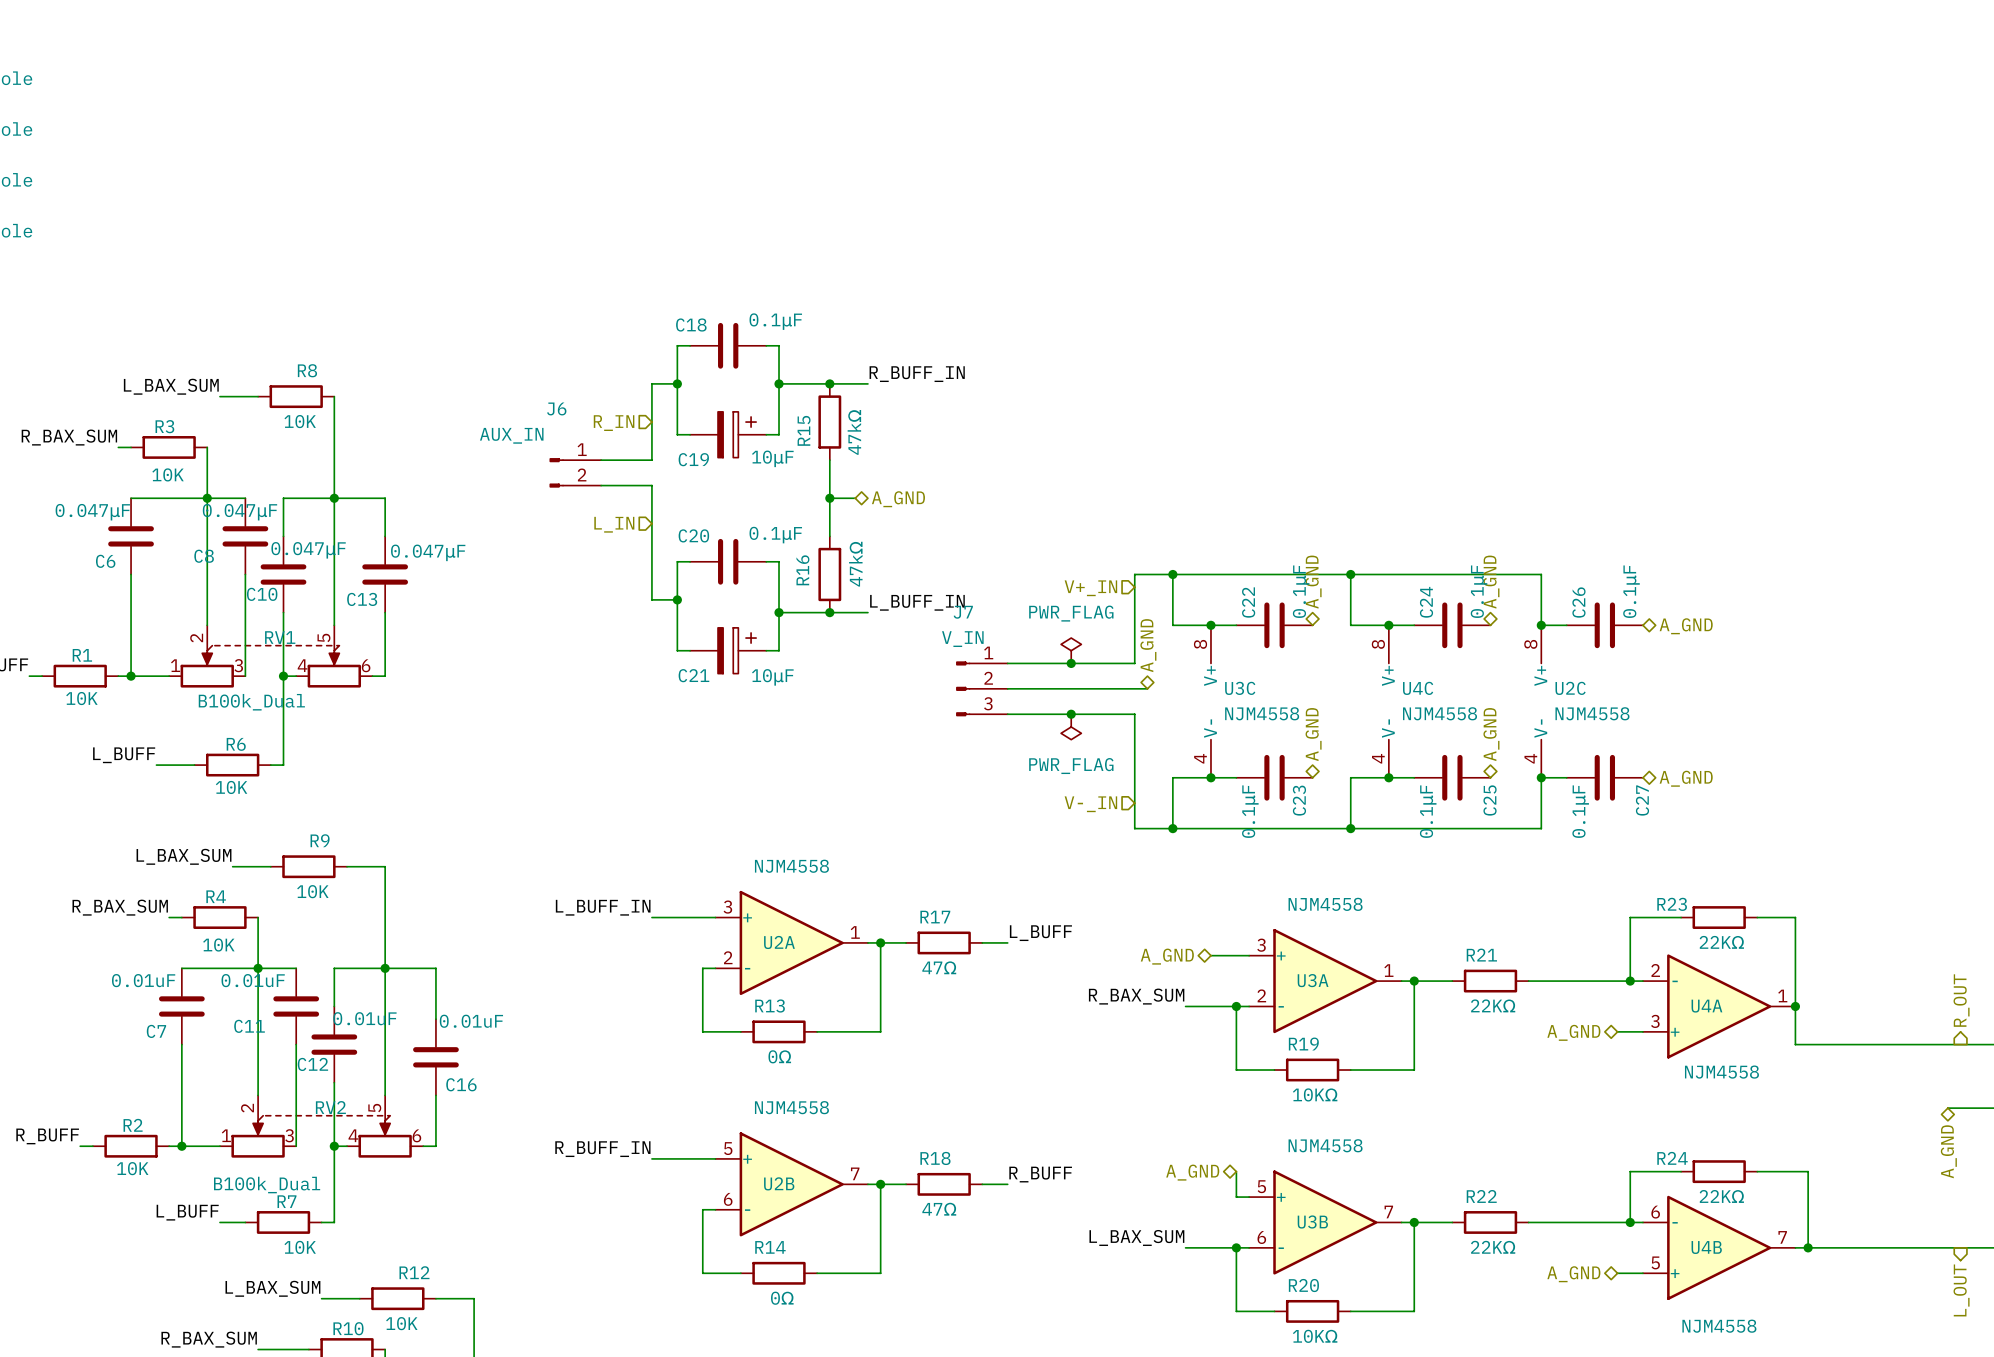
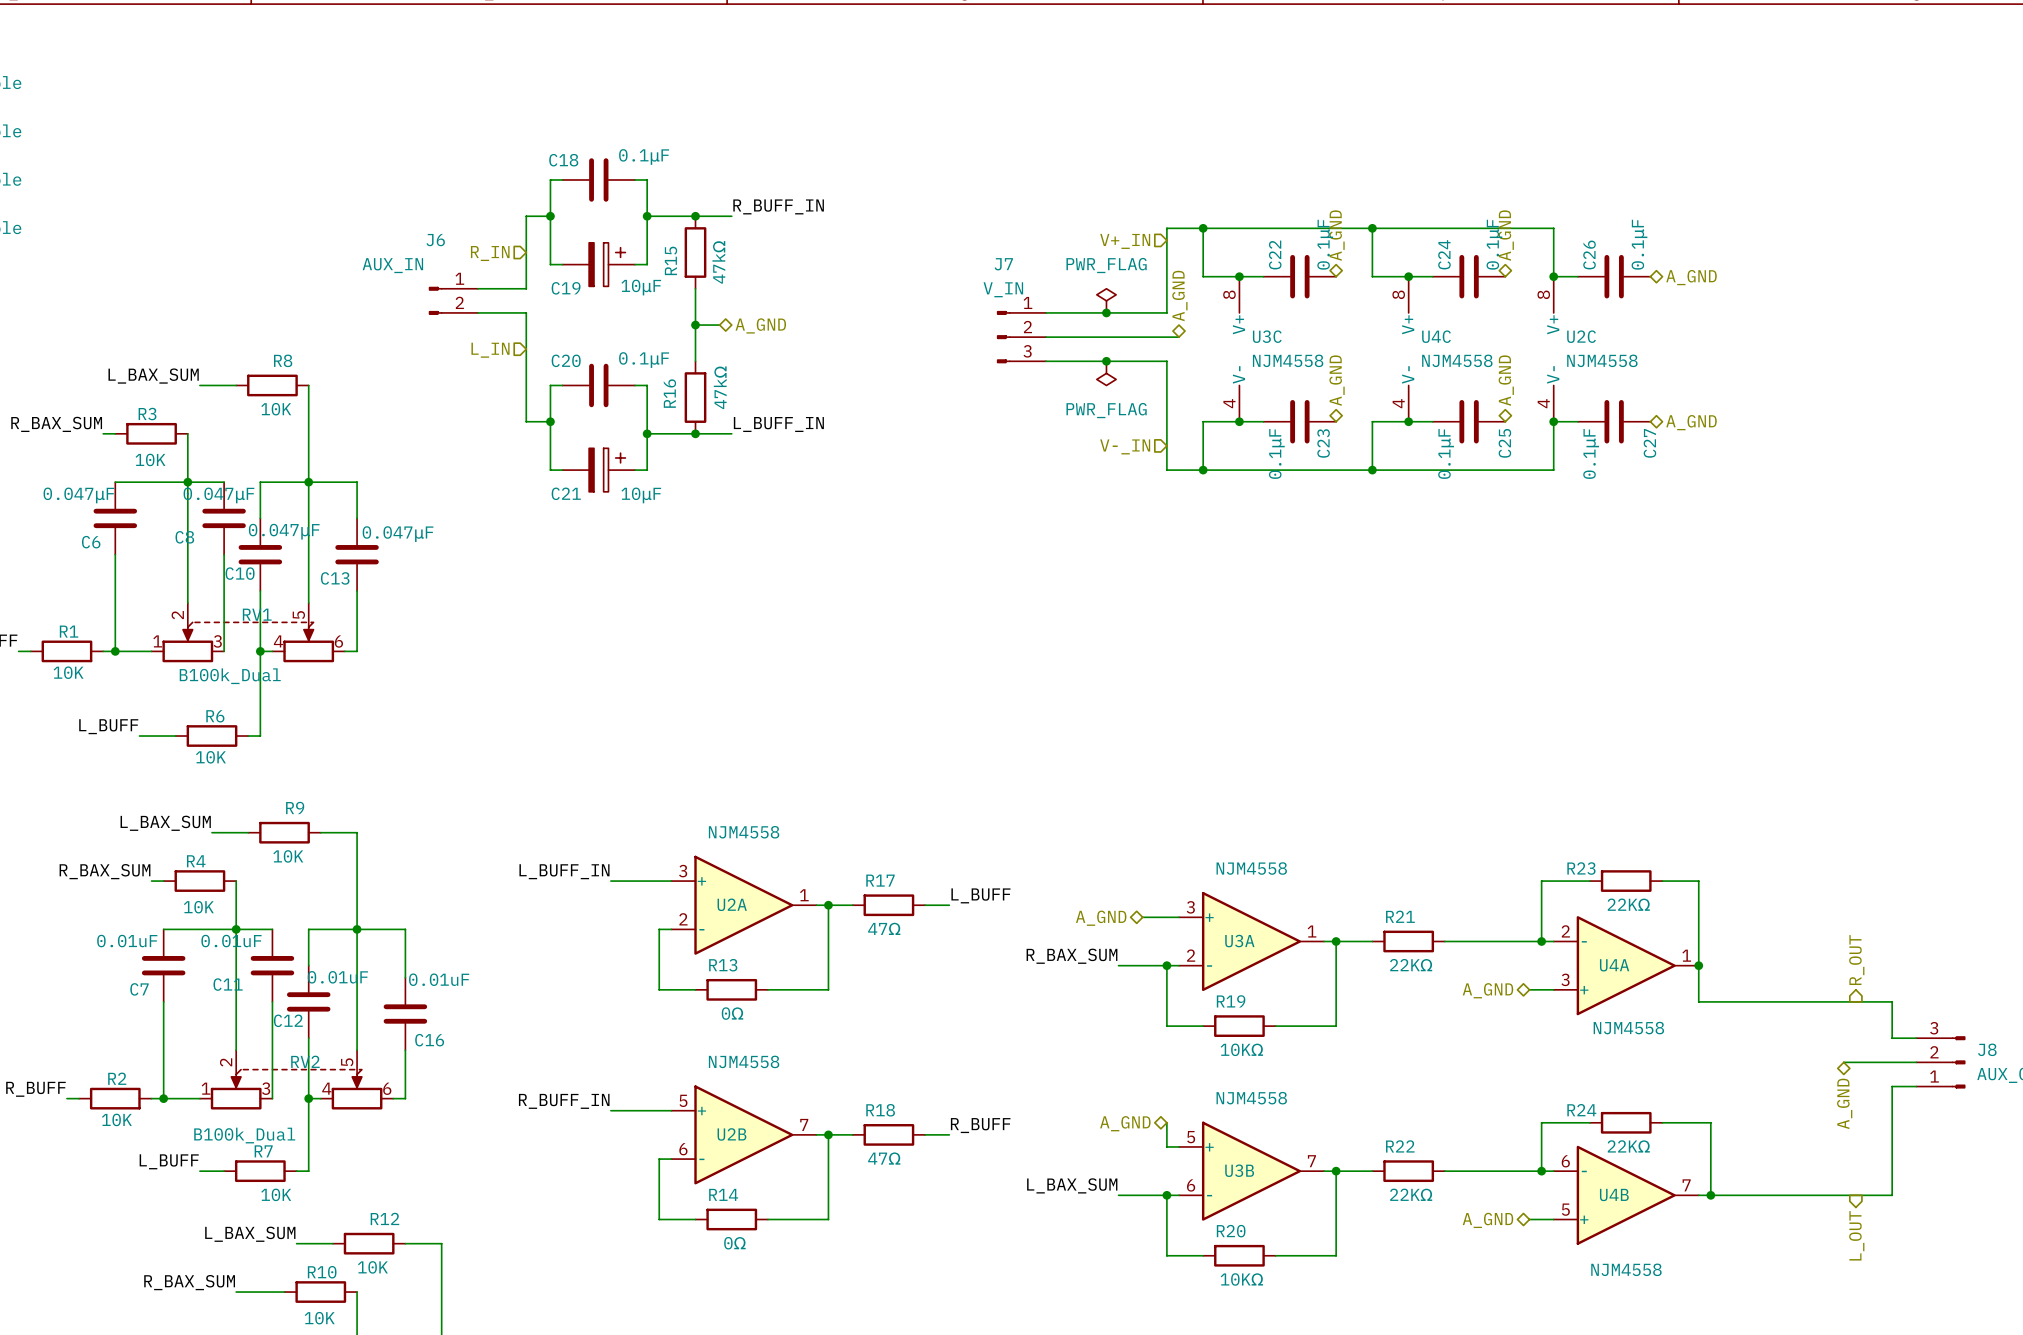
junction: none -> (550, 216)
junction: none -> (647, 216)
junction: none -> (695, 216)
wire: none -> (1203, 228) (1203, 276) (1263, 276)
junction: none -> (1203, 228)
wire: none -> (1372, 228) (1372, 276) (1432, 276)
junction: none -> (1372, 228)
hierarchical label: none -> A_GND (1337, 235)
hierarchical label: none -> A_GND (1506, 235)
hierarchical label: none -> V+_IN (1125, 241)
junction: none -> (1239, 276)
junction: none -> (1408, 276)
junction: none -> (1553, 276)
wire: none -> (1577, 276) (1553, 276) (1553, 228) (1166, 228) (1166, 312) (1046, 312)
hierarchical label: none -> A_GND (1691, 277)
hierarchical label: none -> A_GND (1179, 296)
power symbol: none -> PWR_FLAG (1106, 300)
wire: none -> (477, 312) (526, 312) (526, 421) (550, 421)
junction: none -> (1106, 312)
junction: none -> (695, 325)
wire: (690, 345) (677, 345) (677, 434) (690, 434) -> (562, 179) (550, 179) (550, 264) (562, 264)
C18 position: (728, 345) -> (598, 179)
wire: (766, 345) (779, 345) (779, 434) (766, 434) -> (635, 179) (647, 179) (647, 264) (635, 264)
wire: none -> (1046, 337) (1179, 337)
wire: none -> (1046, 361) (1166, 361) (1166, 470) (1553, 470) (1553, 421) (1577, 421)
junction: none -> (1106, 361)
label position: R_BUFF_IN (917, 374) -> R_BUFF_IN (778, 206)
wire: (677, 383) (651, 383) (651, 460) (601, 460) -> (550, 216) (526, 216) (526, 288) (477, 288)
junction: (677, 383) -> none
wire: (779, 383) (867, 383) -> (647, 216) (731, 216)
junction: (779, 383) -> none
junction: (829, 383) -> none
power symbol: none -> PWR_FLAG (1106, 373)
hierarchical label: none -> A_GND (1337, 380)
hierarchical label: none -> A_GND (1506, 380)
R15 position: (829, 422) -> (695, 252)
hierarchical label position: R_IN (614, 423) -> R_IN (490, 253)
junction: none -> (550, 421)
C19 position: (728, 434) -> (598, 264)
junction: none -> (1239, 421)
wire: none -> (1263, 421) (1203, 421) (1203, 470)
junction: none -> (1408, 421)
wire: none -> (1432, 421) (1372, 421) (1372, 470)
junction: none -> (1553, 421)
hierarchical label: none -> A_GND (1691, 422)
junction: none -> (647, 433)
junction: none -> (695, 433)
wire: (829, 460) (829, 536) -> (695, 288) (695, 361)
hierarchical label: none -> V-_IN (1125, 446)
J6 position: (575, 472) -> (453, 300)
wire: (601, 485) (651, 485) (651, 599) (677, 599) -> (562, 470) (550, 470) (550, 385) (562, 385)
junction: none -> (1203, 470)
junction: none -> (1372, 470)
wire: (829, 498) (855, 498) -> (695, 325) (719, 325)
junction: (829, 498) -> none
hierarchical label position: A_GND (898, 499) -> A_GND (760, 325)
hierarchical label position: L_IN (614, 524) -> L_IN (490, 350)
wire: (690, 561) (677, 561) (677, 650) (690, 650) -> none
C20 position: (728, 561) -> (598, 385)
wire: (766, 561) (779, 561) (779, 650) (766, 650) -> (635, 385) (647, 385) (647, 470) (635, 470)
R16 position: (829, 574) -> (695, 397)
wire: (1172, 574) (1172, 625) (1236, 625) -> none
junction: (1172, 574) -> none
wire: (1350, 574) (1350, 625) (1414, 625) -> none
junction: (1350, 574) -> none
hierarchical label: A_GND (1313, 582) -> none
hierarchical label: A_GND (1491, 582) -> none
hierarchical label: V+_IN (1090, 588) -> none
junction: (677, 599) -> none
label position: L_BUFF_IN (917, 602) -> L_BUFF_IN (778, 424)
wire: (779, 612) (867, 612) -> (647, 433) (731, 433)
junction: (779, 612) -> none
junction: (829, 612) -> none
junction: (1210, 625) -> none
C22 position: (1274, 625) -> (1299, 276)
junction: (1388, 625) -> none
C24 position: (1452, 625) -> (1469, 276)
junction: (1541, 625) -> none
wire: (1566, 625) (1541, 625) (1541, 574) (1134, 574) (1134, 663) (1007, 663) -> none
C26 position: (1604, 625) -> (1614, 276)
hierarchical label: A_GND (1686, 626) -> none
hierarchical label: A_GND (1148, 645) -> none
C21 position: (728, 650) -> (598, 470)
power symbol: PWR_FLAG (1071, 650) -> none
junction: (1071, 663) -> none
J7 position: (981, 688) -> (1021, 337)
wire: (1007, 688) (1147, 688) -> none
U3C position: (1210, 701) -> (1239, 349)
U4C position: (1388, 701) -> (1408, 349)
U2C position: (1541, 701) -> (1553, 349)
wire: (1007, 714) (1134, 714) (1134, 828) (1541, 828) (1541, 777) (1566, 777) -> none
junction: (1071, 714) -> none
power symbol: PWR_FLAG (1071, 726) -> none
hierarchical label: A_GND (1313, 734) -> none
hierarchical label: A_GND (1491, 734) -> none
junction: (1210, 777) -> none
wire: (1236, 777) (1172, 777) (1172, 828) -> none
C23 position: (1274, 777) -> (1299, 421)
junction: (1388, 777) -> none
wire: (1414, 777) (1350, 777) (1350, 828) -> none
C25 position: (1452, 777) -> (1469, 421)
junction: (1541, 777) -> none
C27 position: (1604, 777) -> (1614, 421)
hierarchical label: A_GND (1686, 778) -> none
hierarchical label: V-_IN (1090, 804) -> none
junction: (1172, 828) -> none
junction: (1350, 828) -> none

